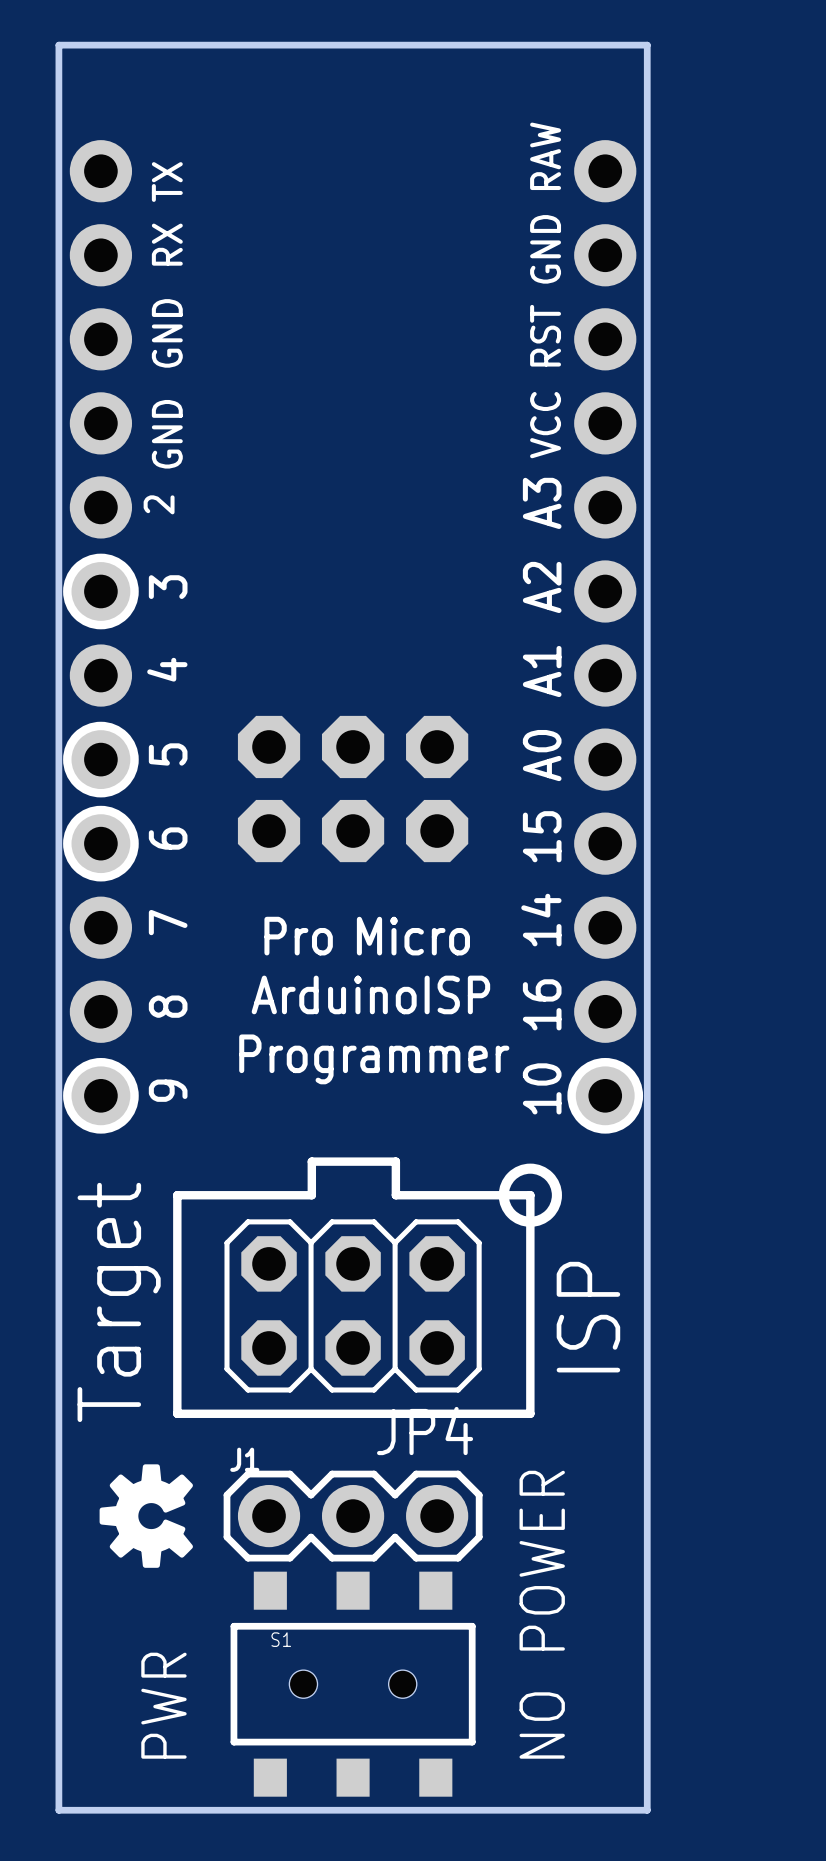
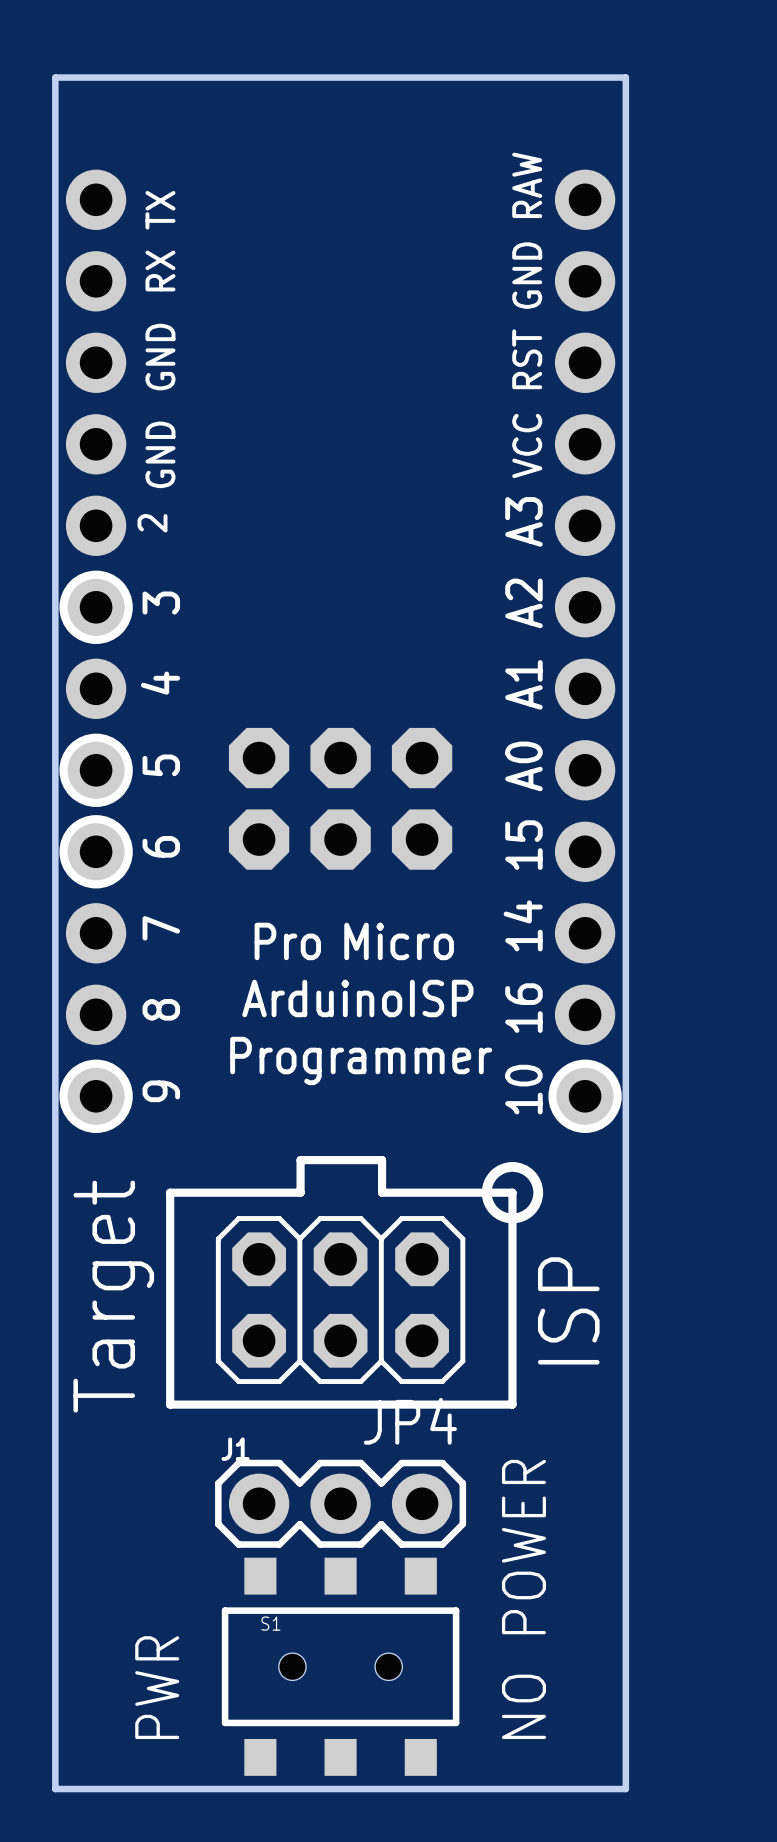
drawing: [99, 1464, 193, 1568] -> none

